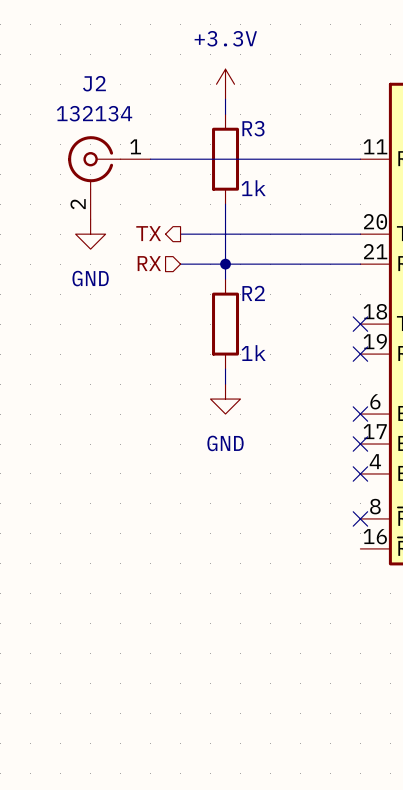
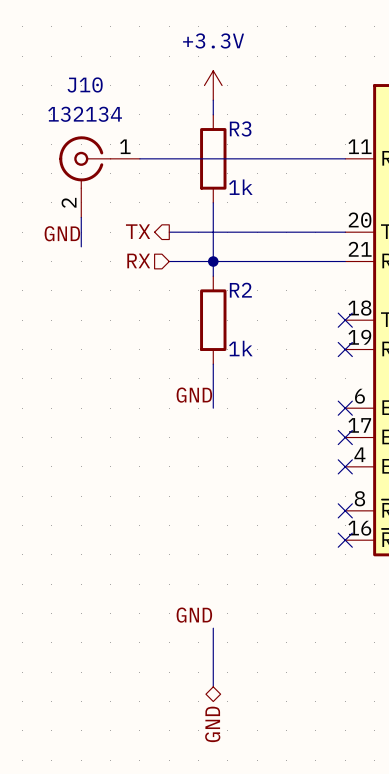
J2 name: J2 (94, 83) -> J10 (85, 84)
power symbol: GND (90, 234) -> none
label: none -> GND (62, 233)
power symbol: GND (225, 399) -> none
label: none -> GND (194, 395)
no-connect mark: none -> (345, 540)
label: none -> GND (194, 615)
wire: none -> (213, 628) (213, 686)
hierarchical label: none -> GND (212, 724)

